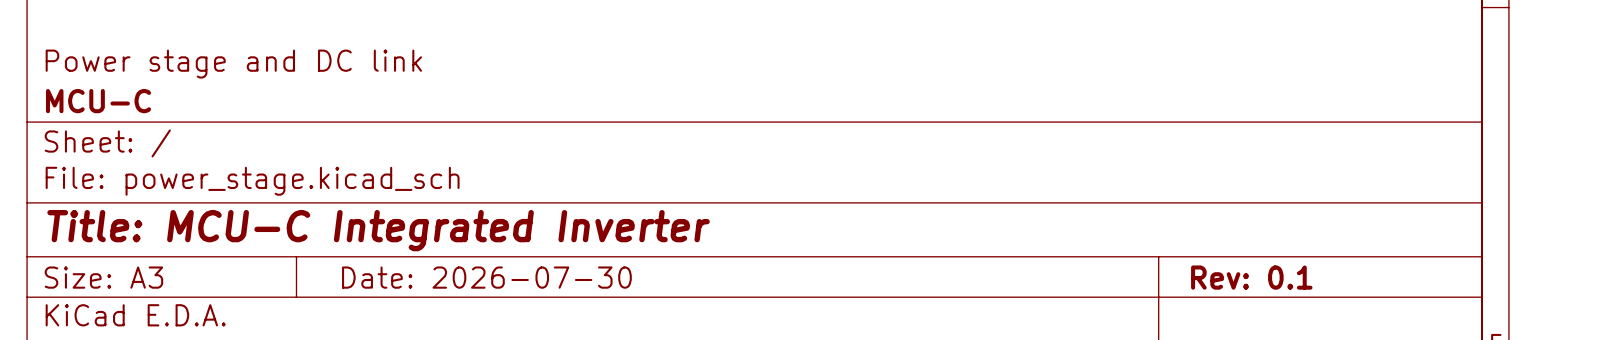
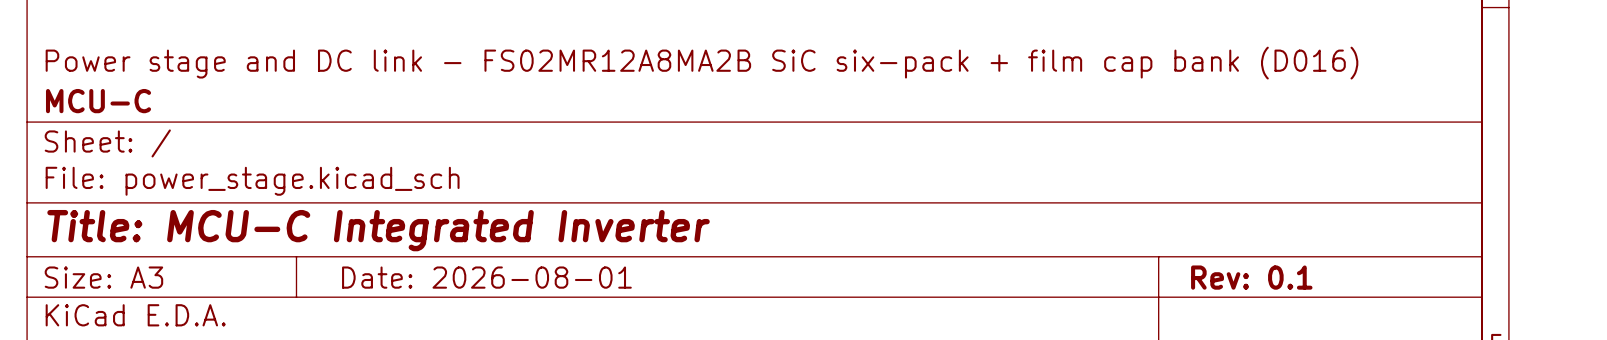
title block: Power stage and DC link (233, 64) -> Power stage and DC link - FS02MR12A8MA2B SiC six-pack + film cap bank (D016) (701, 63)
title block: Date: 2026-07-30 (486, 277) -> Date: 2026-08-01 (486, 277)

